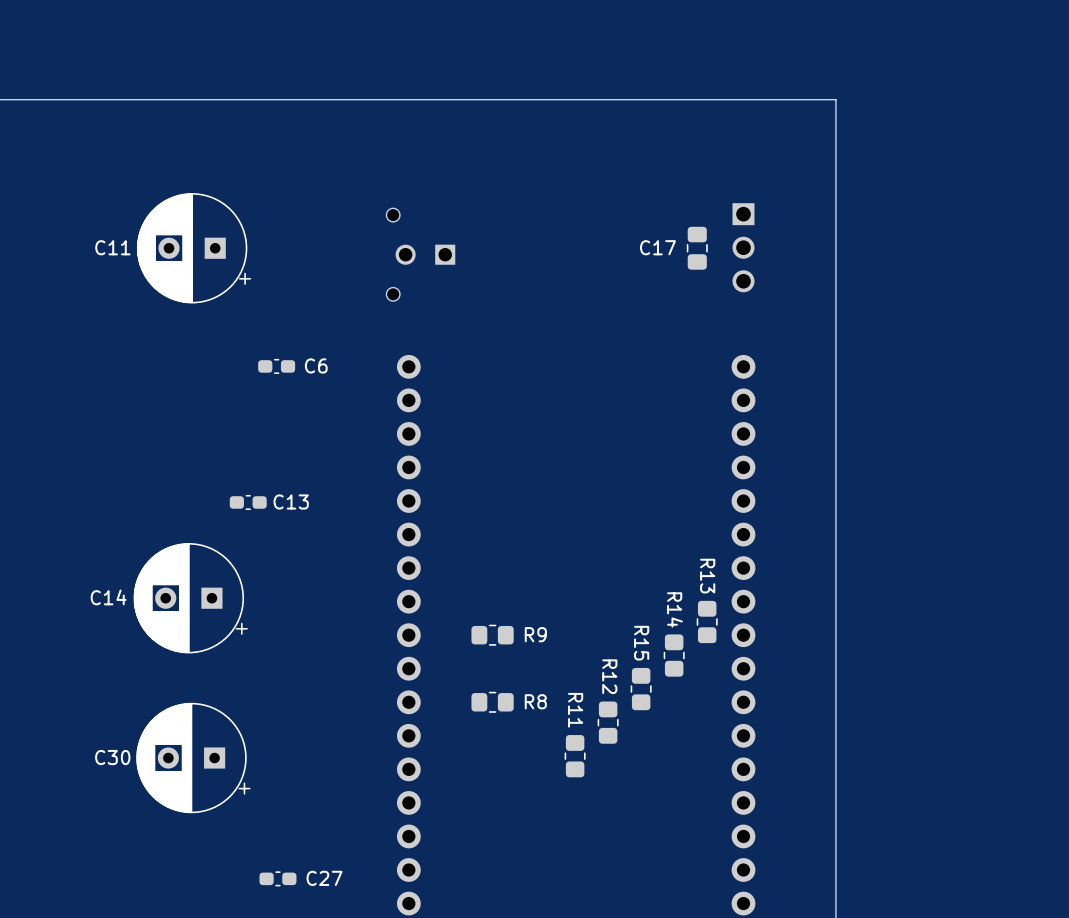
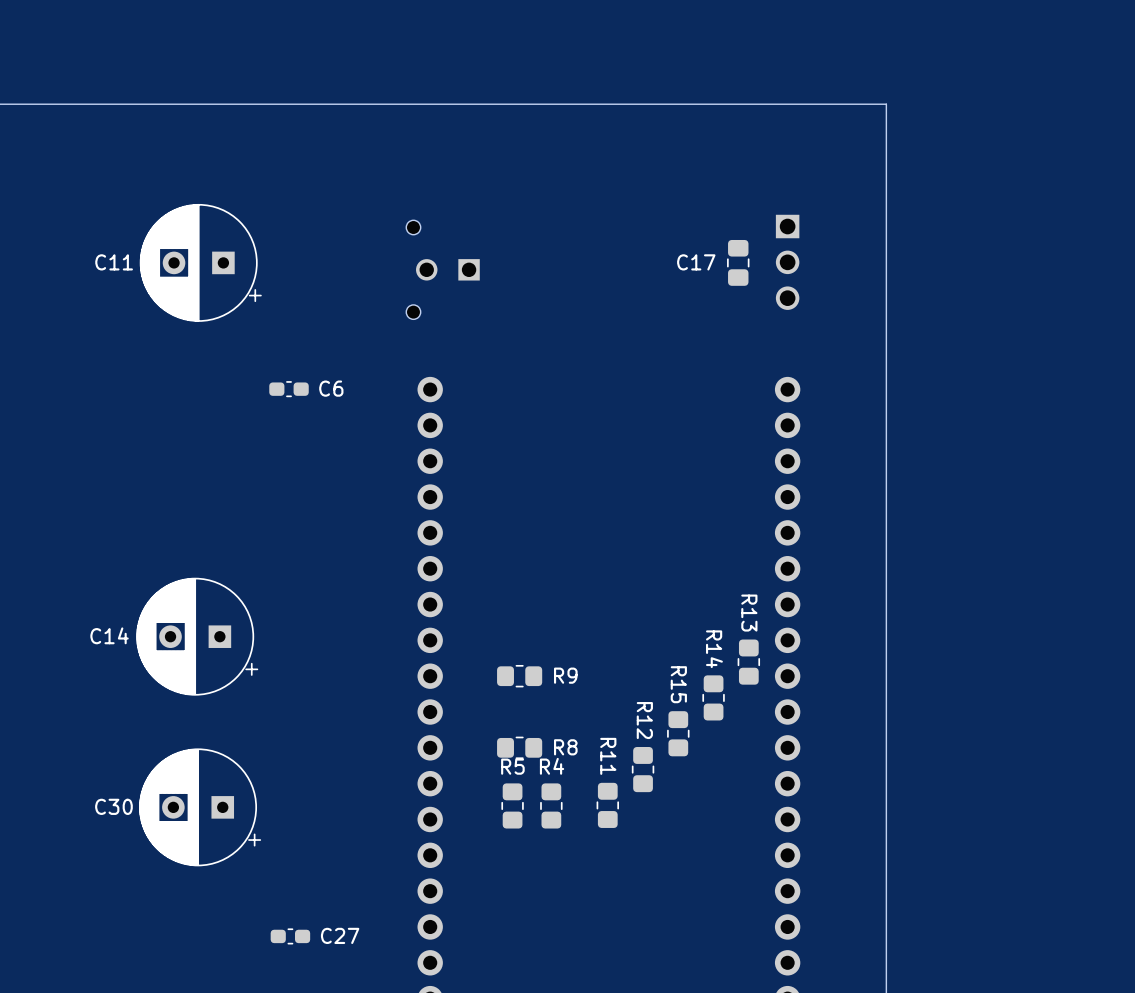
C13: (248, 502) -> none
R5: none -> (512, 805)
R4: none -> (551, 805)

